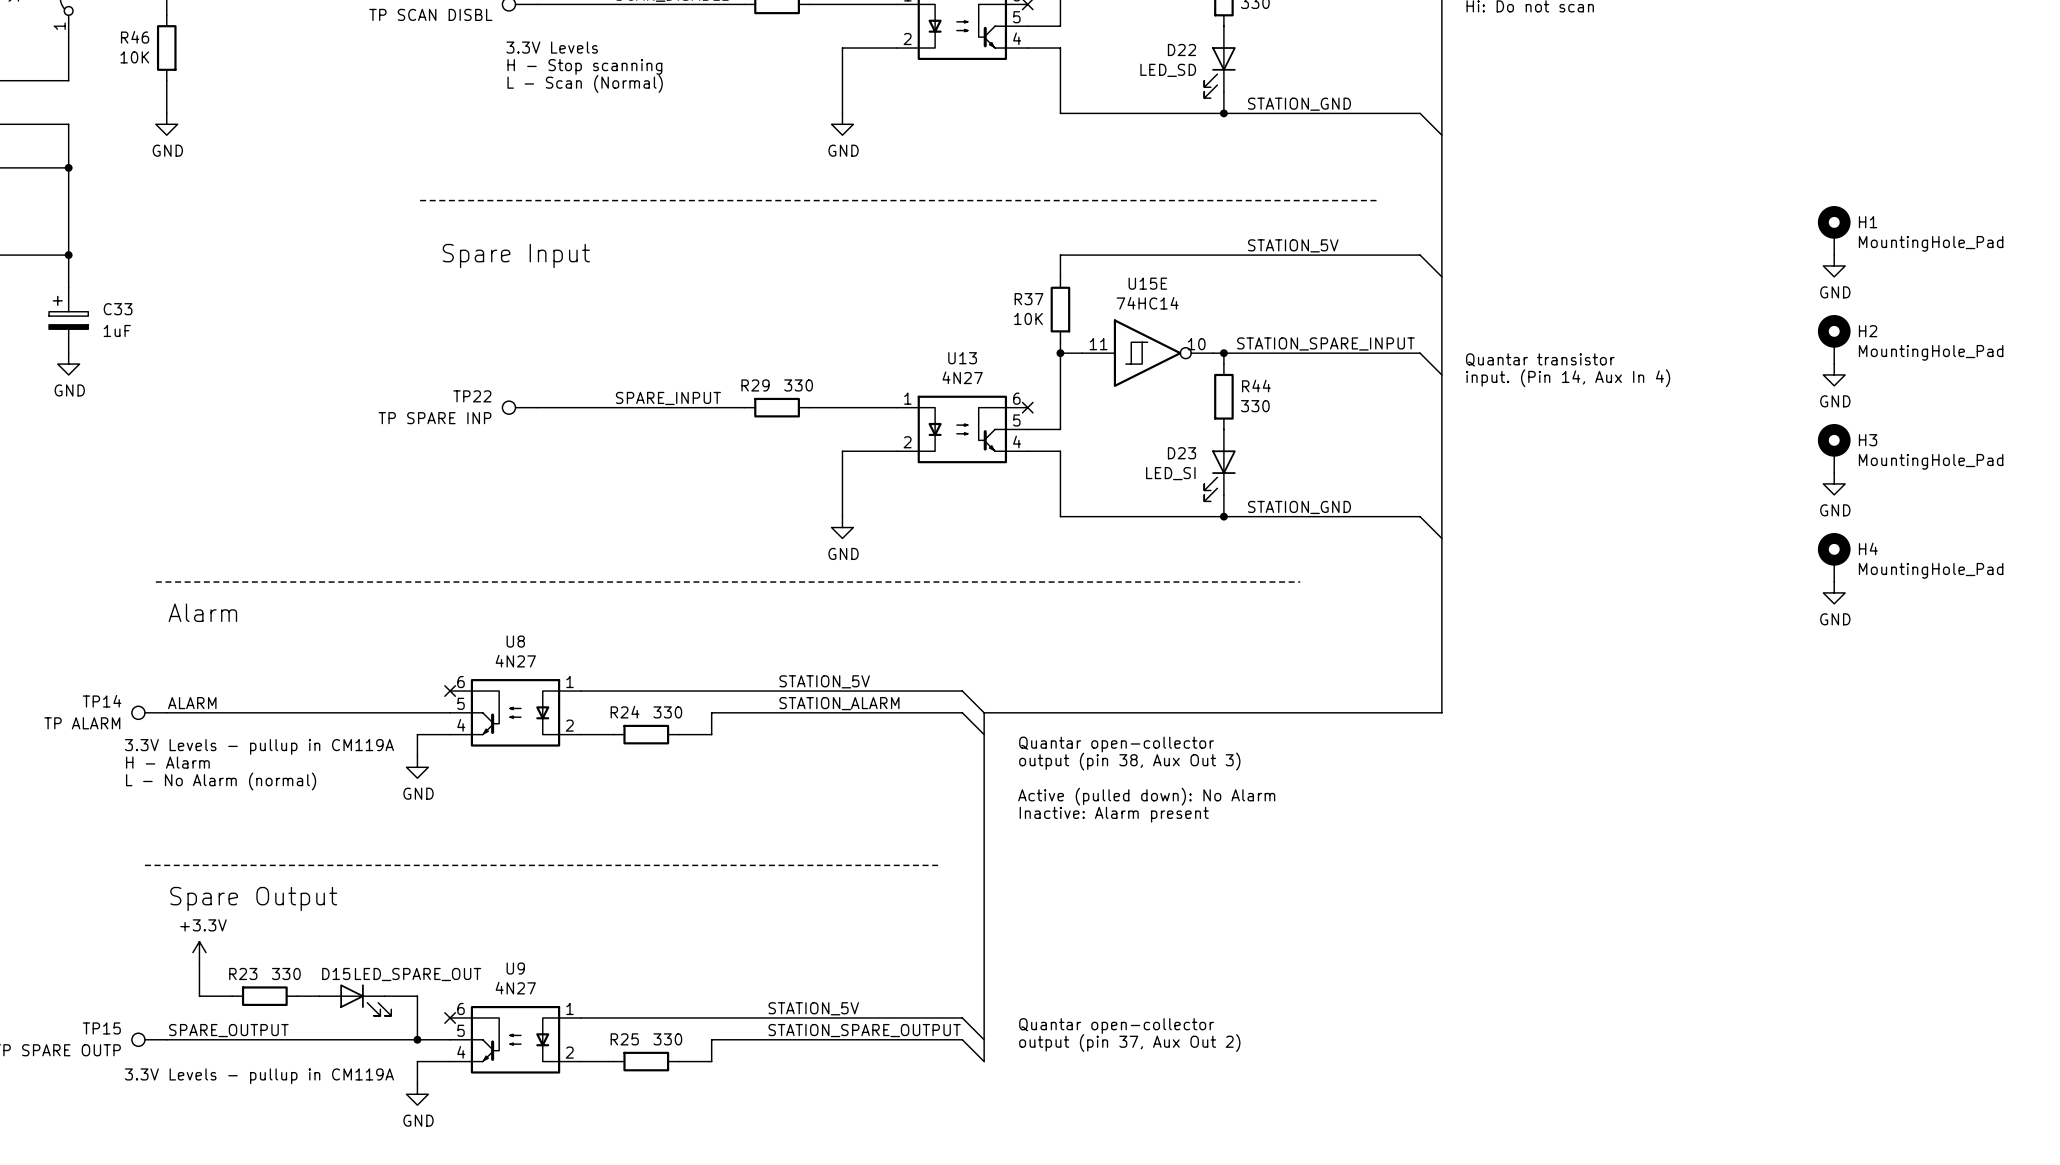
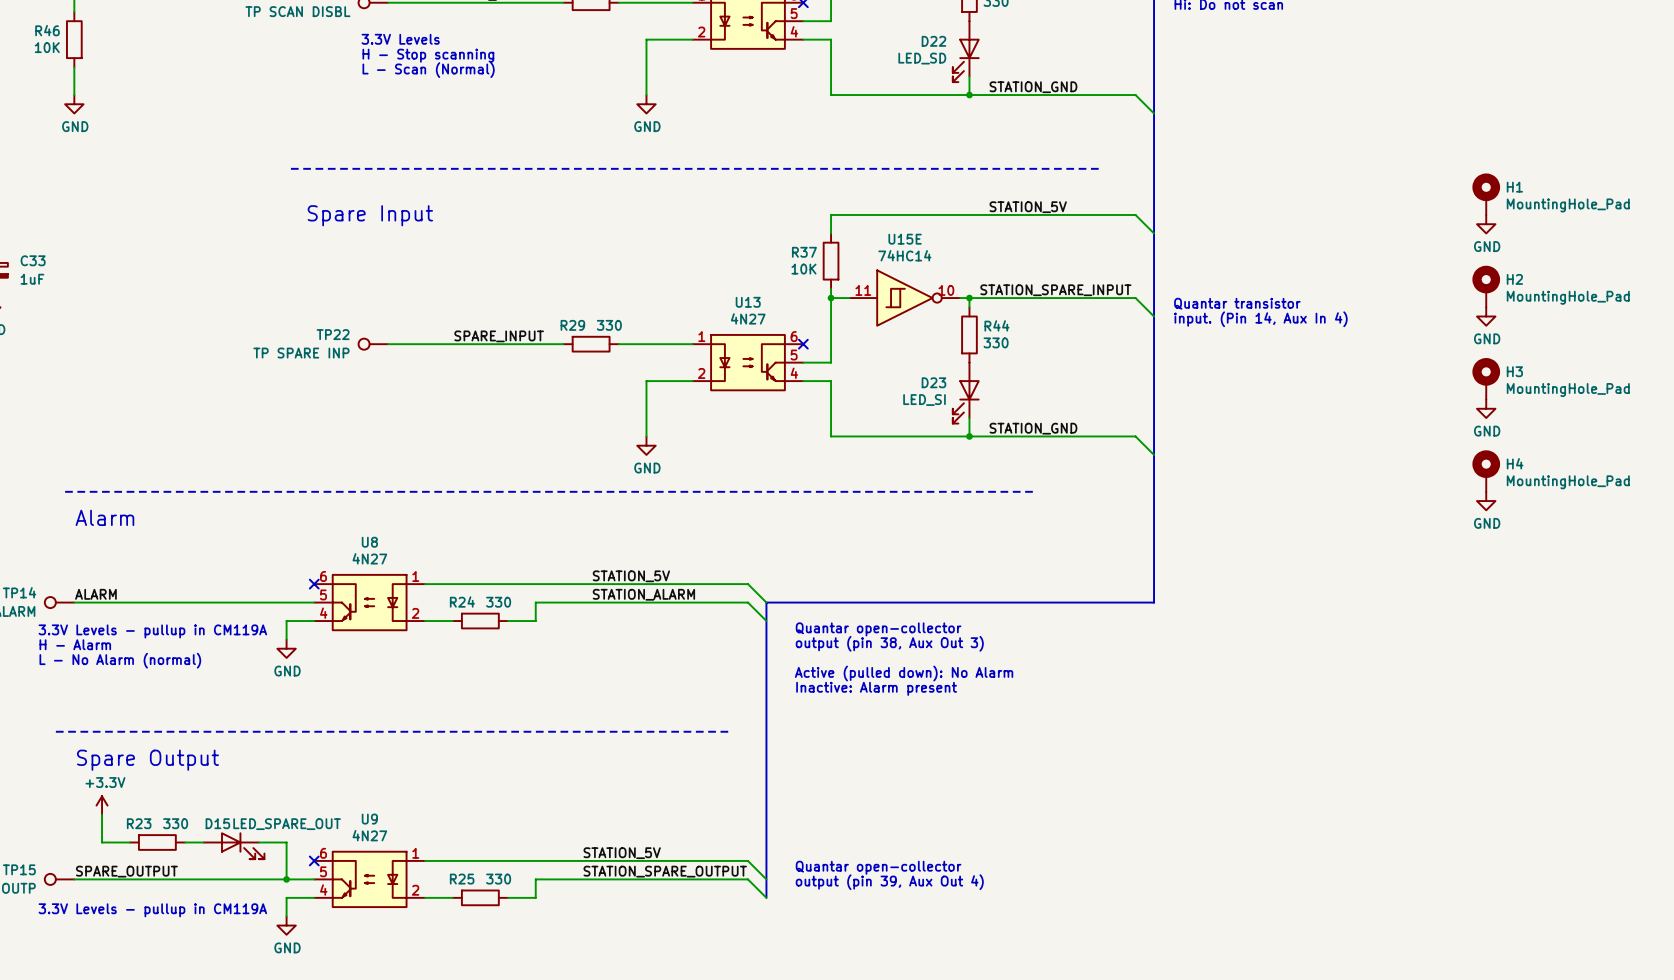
text: output (pin 37, Aux Out 2) (1129, 1043) -> output (pin 39, Aux Out 4) (889, 882)

